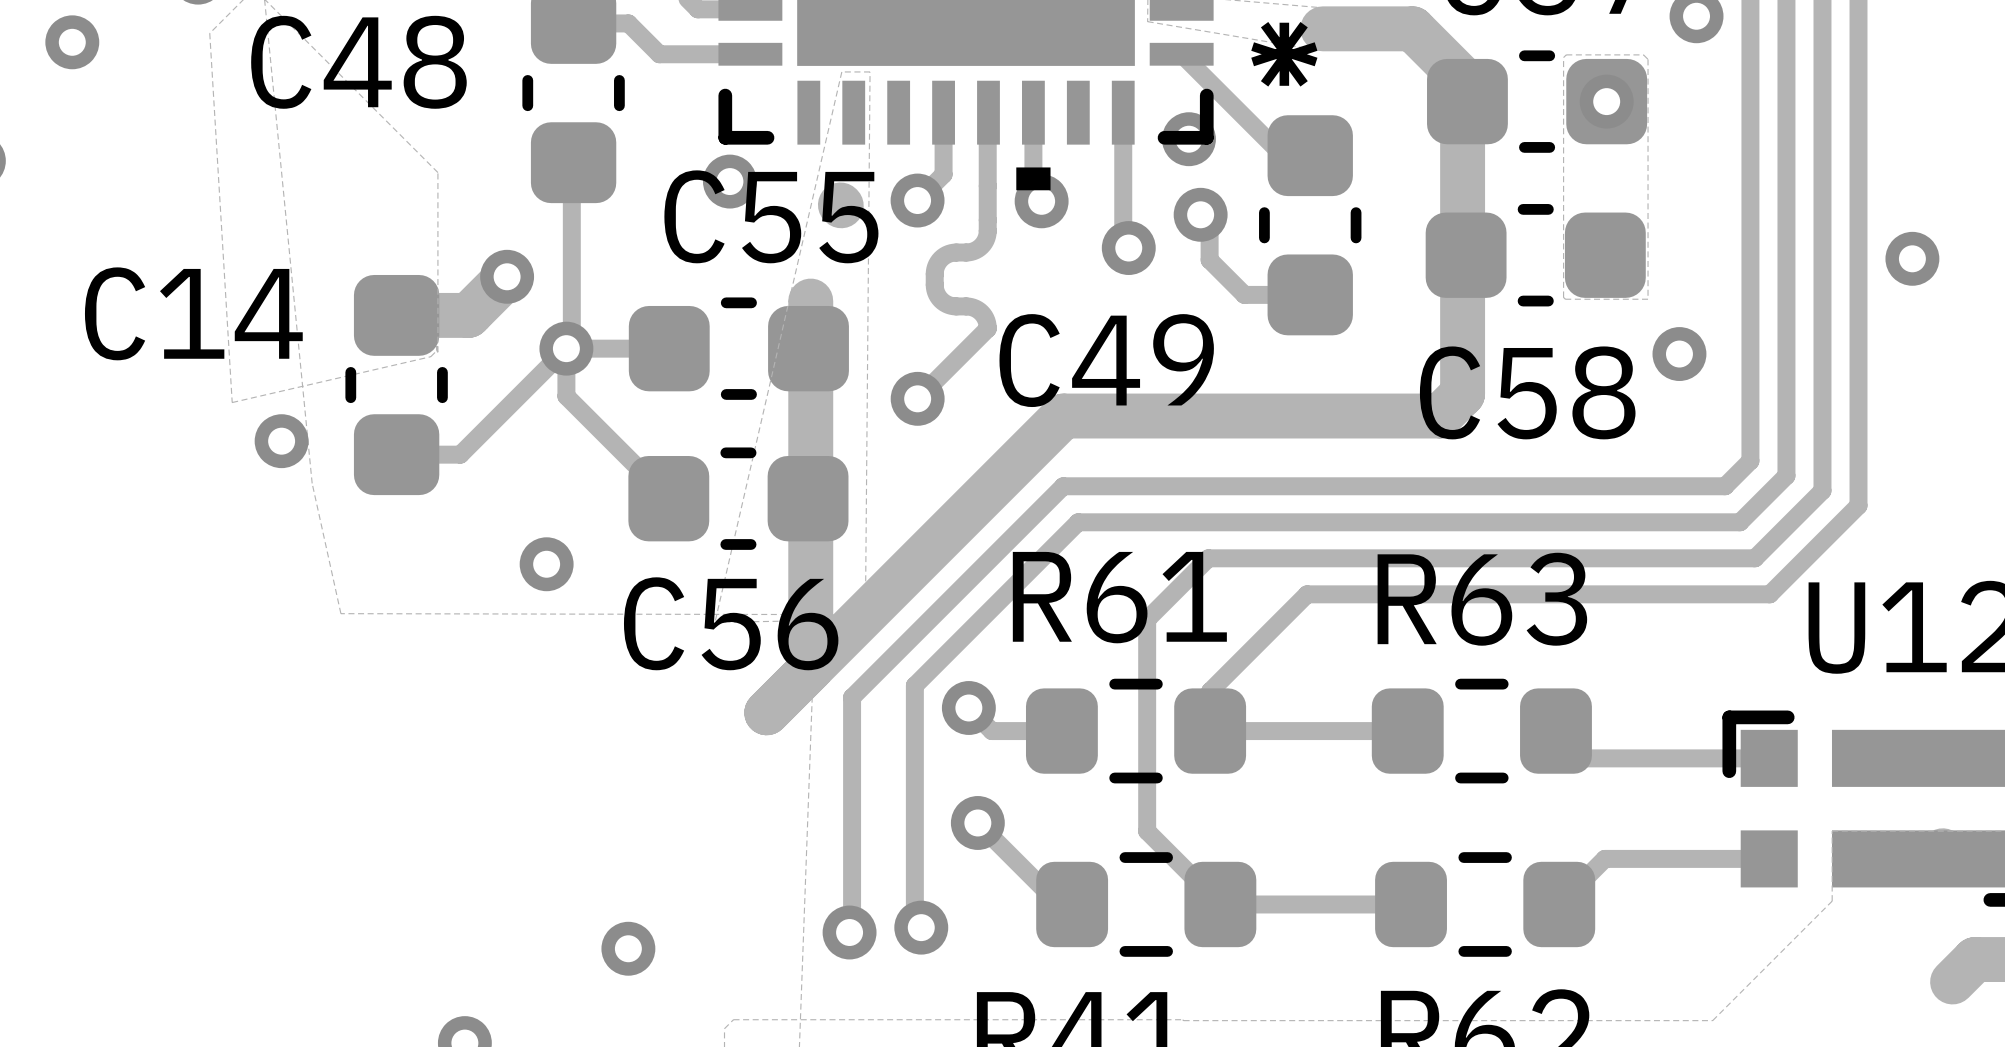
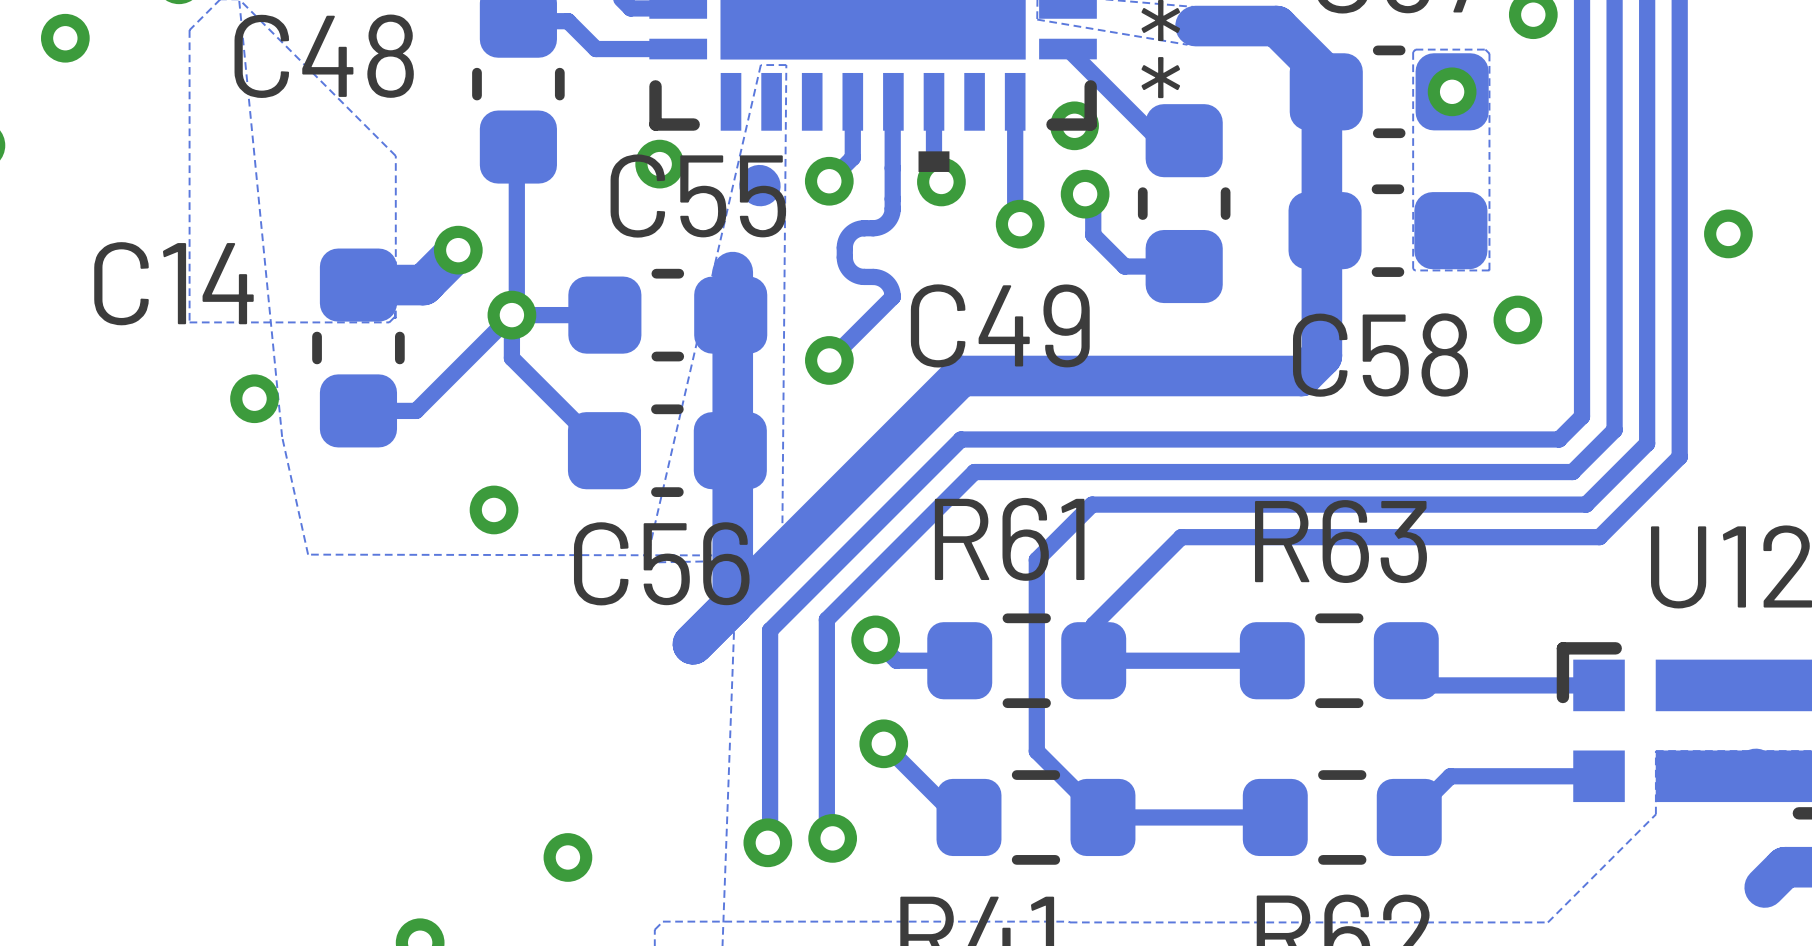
zone outline: (209, 33) (232, 402) (430, 356) -> (189, 30) (189, 322) (389, 322)

